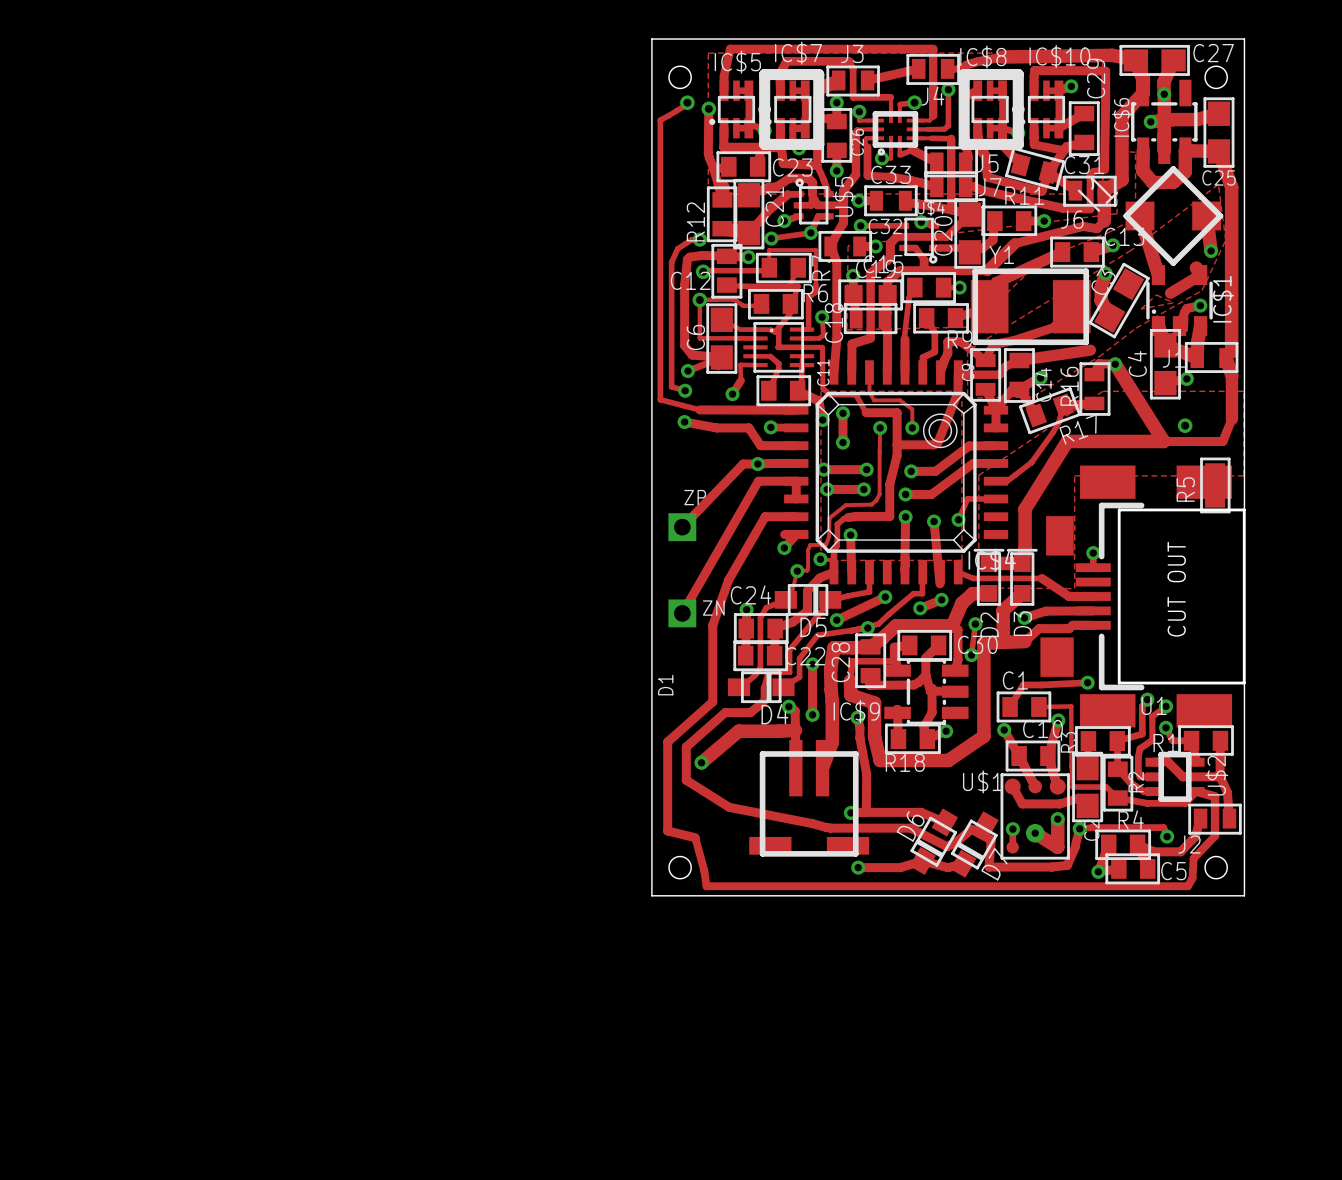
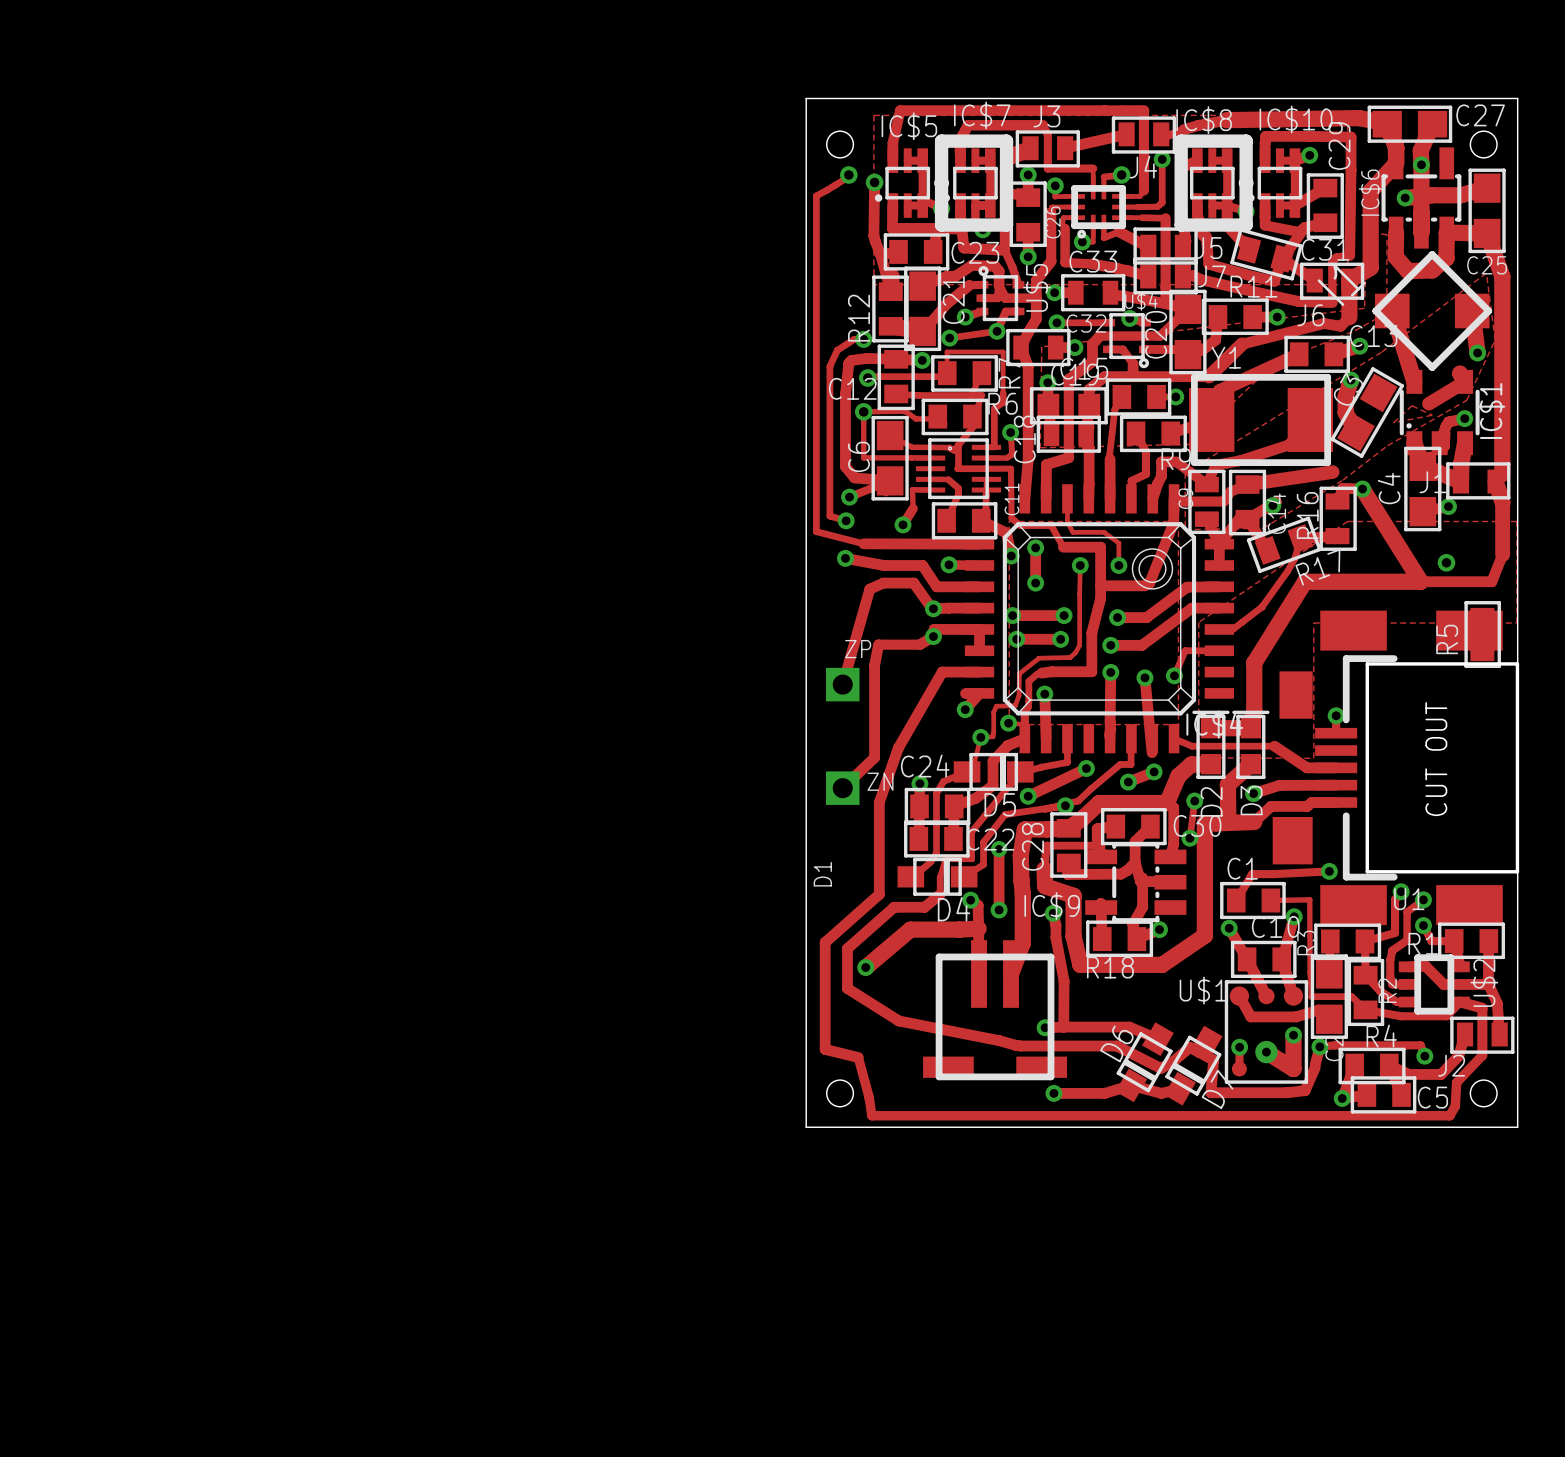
track: (757, 464) (743, 464) (682, 527) -> (933, 608) (913, 583) (883, 583) (869, 589) (842, 684)
track: (758, 481) (682, 613) -> (934, 629) (933, 636) (919, 644) (878, 644) (874, 665) (874, 757) (842, 788)
via: none -> (933, 636)

